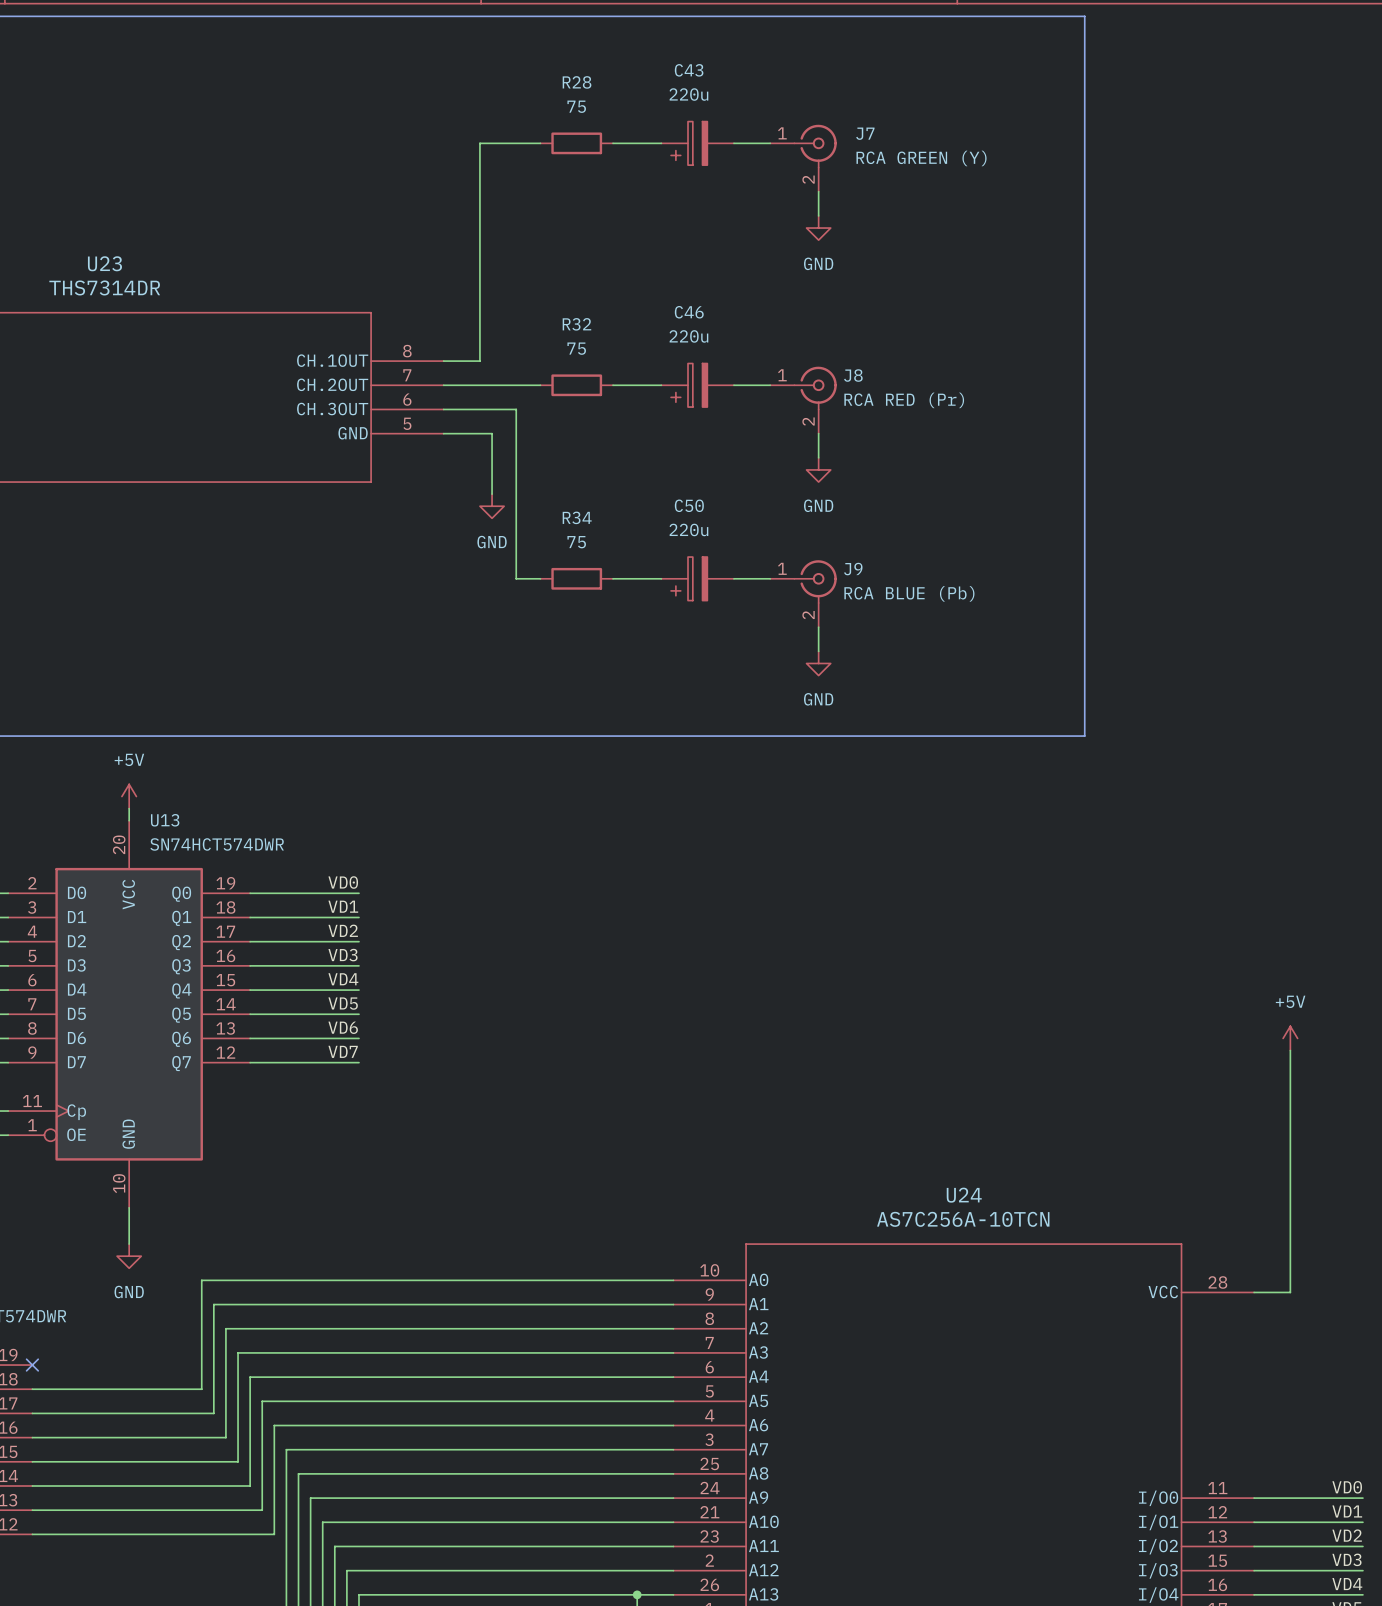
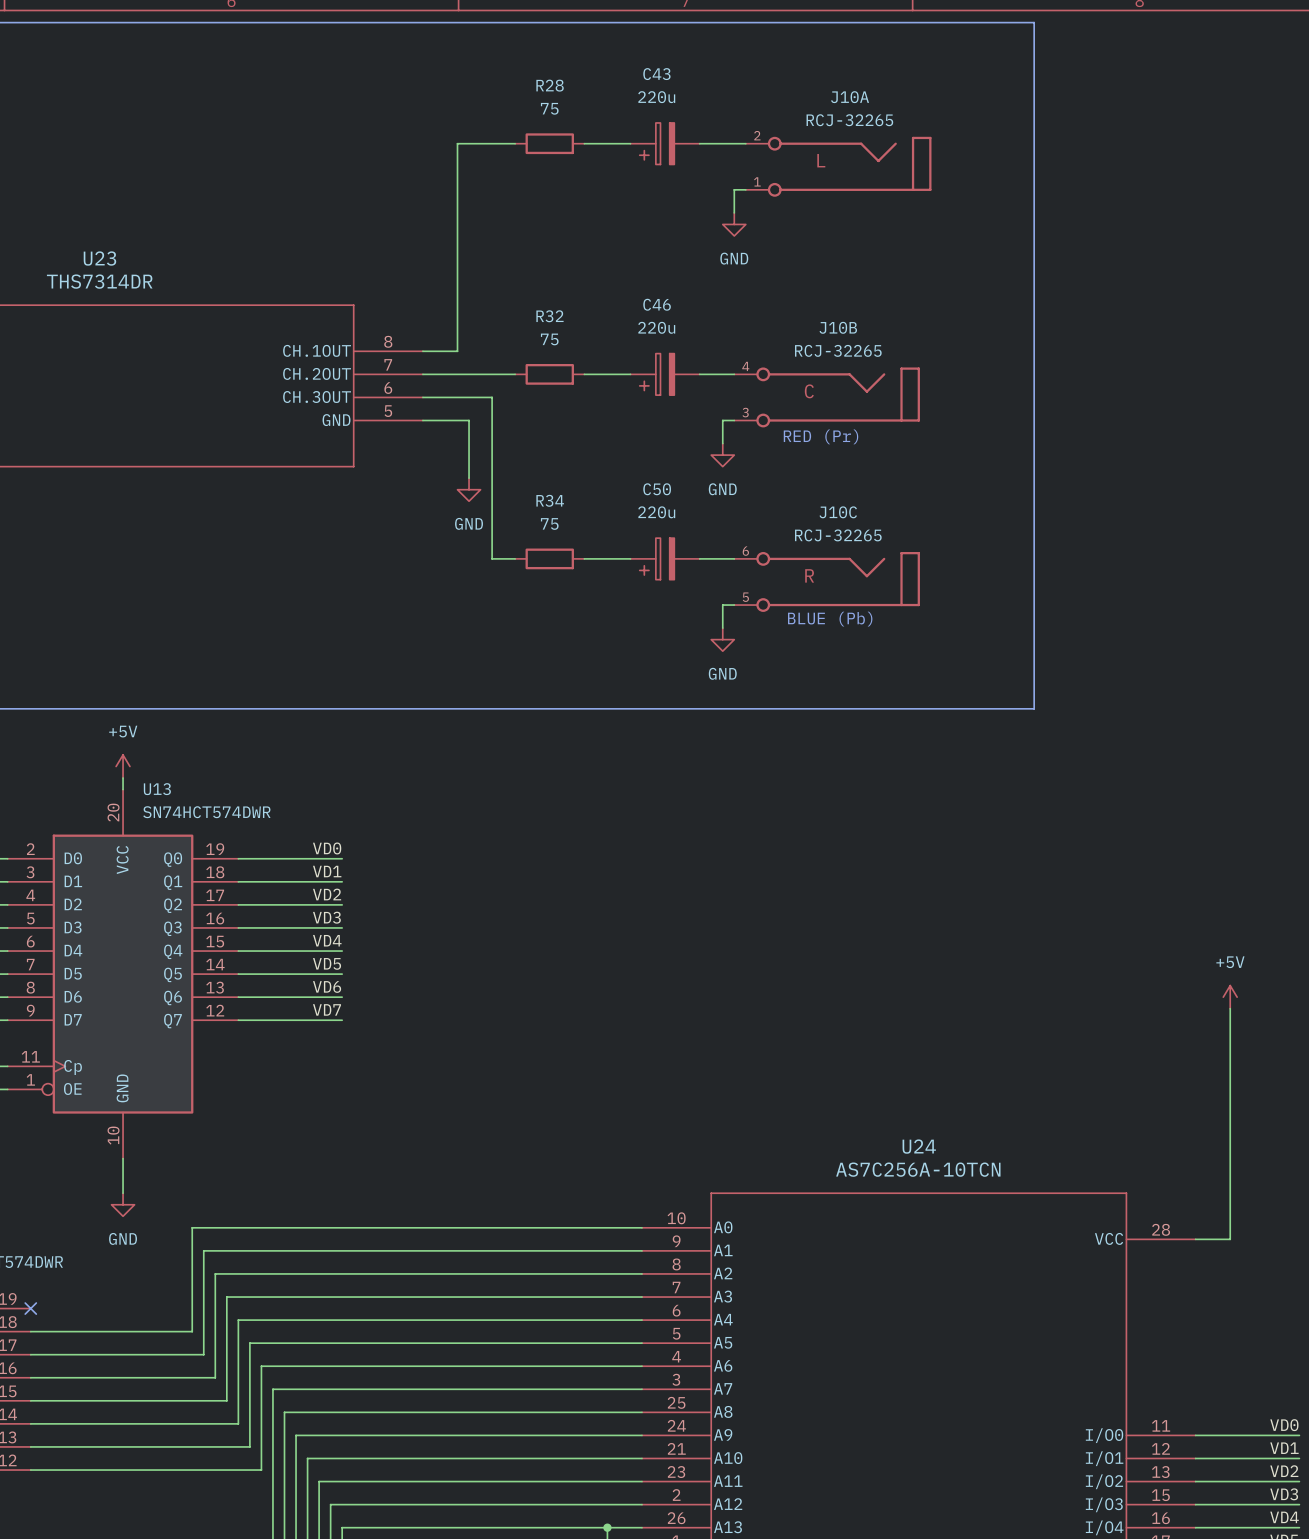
J7: RCA GREEN (Y) (803, 158) -> none
J10A: none -> RCJ-32265 (838, 166)
wire: none -> (745, 189) (734, 189) (734, 212)
wire: (818, 191) (818, 215) -> none
power symbol position: GND (818, 228) -> GND (734, 224)
J8: RCA RED (Pr) (803, 400) -> none
J10B: none -> RCJ-32265 (827, 397)
wire: none -> (734, 420) (722, 420) (722, 443)
wire: (818, 433) (818, 457) -> none
text: none -> RED (Pr) (820, 436)
power symbol position: GND (818, 469) -> GND (722, 455)
J9: RCA BLUE (Pb) (803, 593) -> none
J10C: none -> RCJ-32265 (827, 581)
wire: none -> (734, 605) (722, 605) (722, 628)
wire: (818, 627) (818, 651) -> none
text: none -> BLUE (Pb) (830, 619)
power symbol position: GND (818, 663) -> GND (722, 639)

